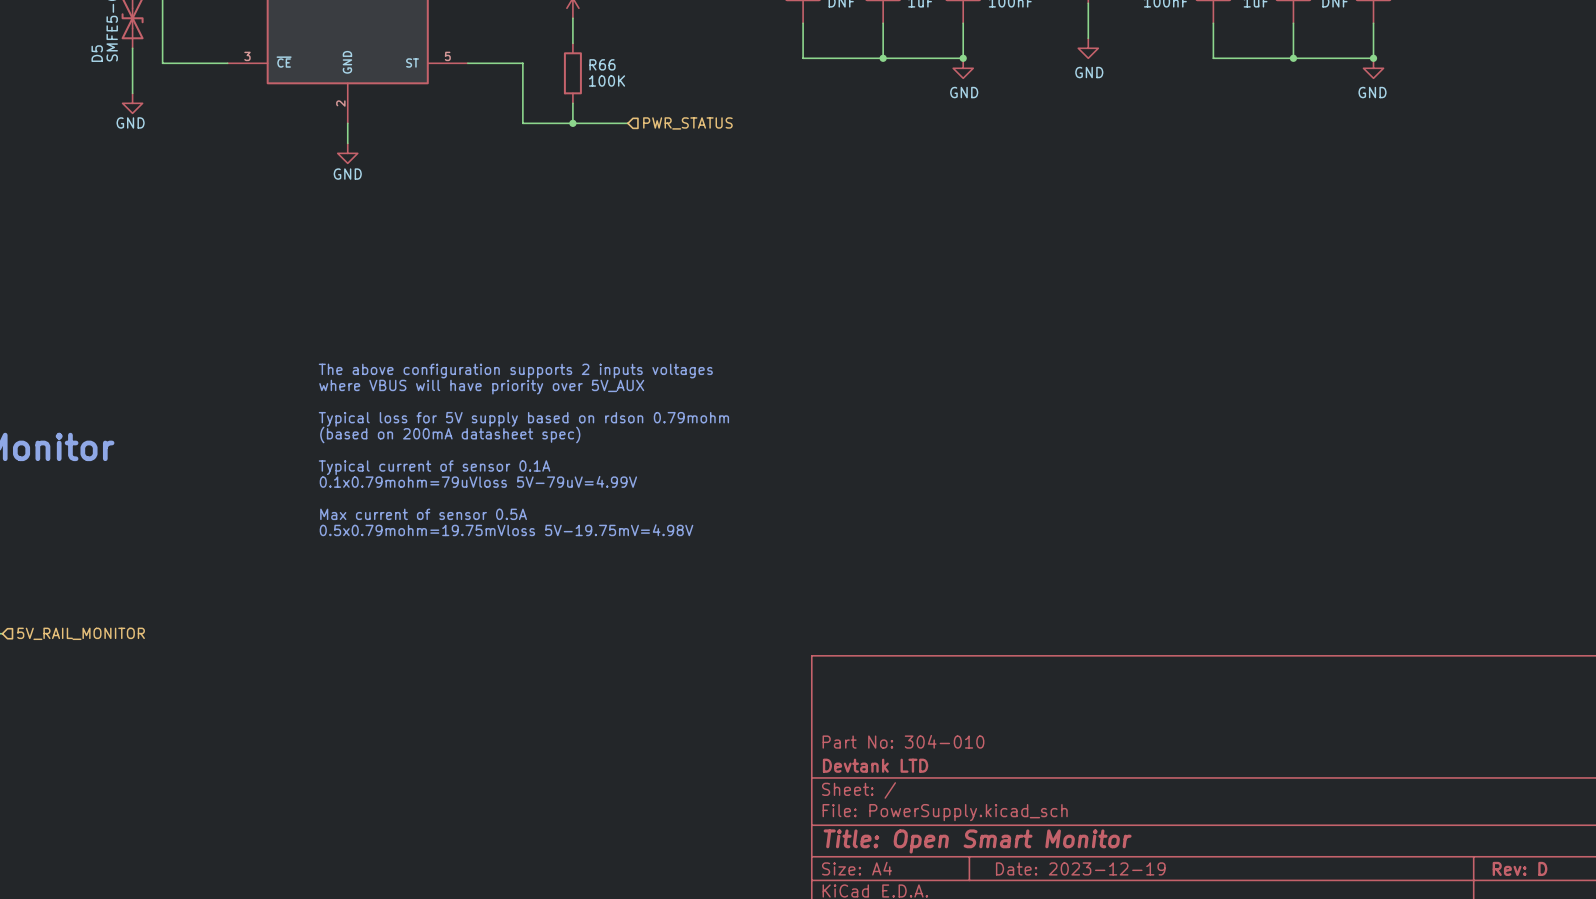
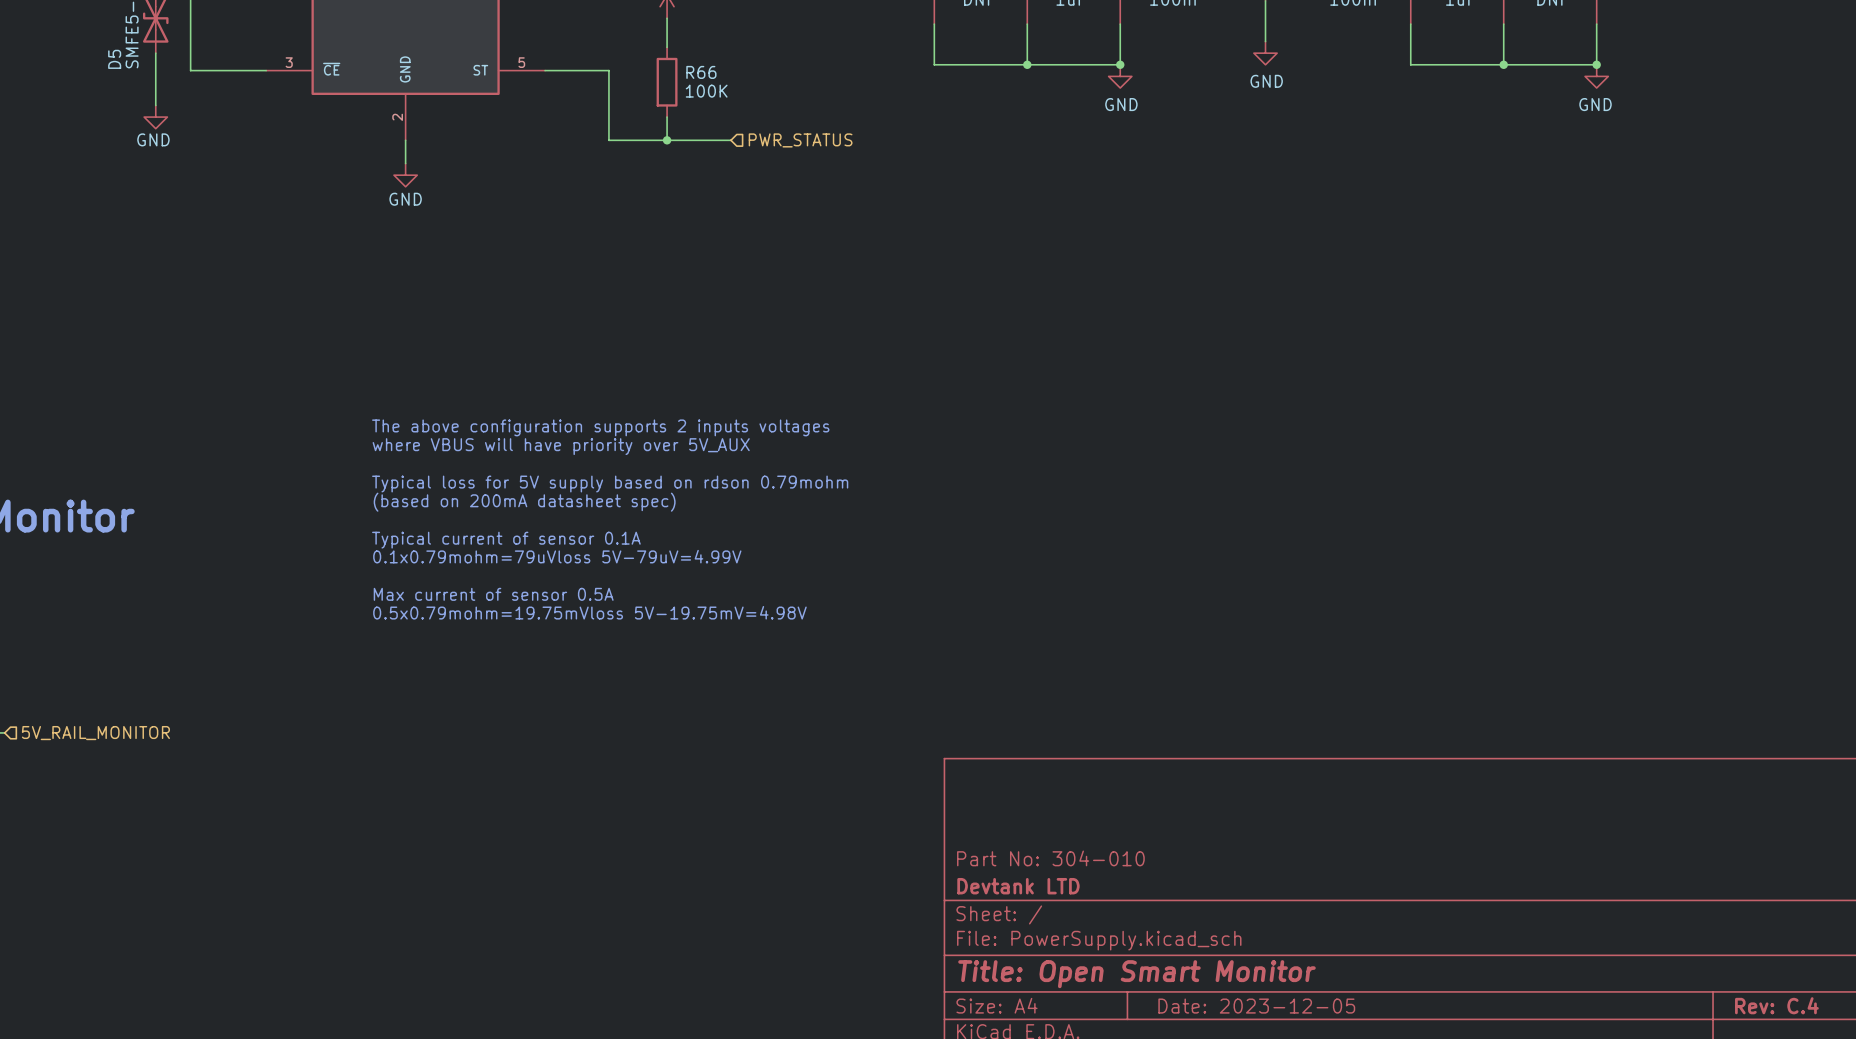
title block: Date: 2023-12-19 (1080, 868) -> Date: 2023-12-05 (1256, 1006)
title block: Rev: D (1520, 868) -> Rev: C.4 (1776, 1005)

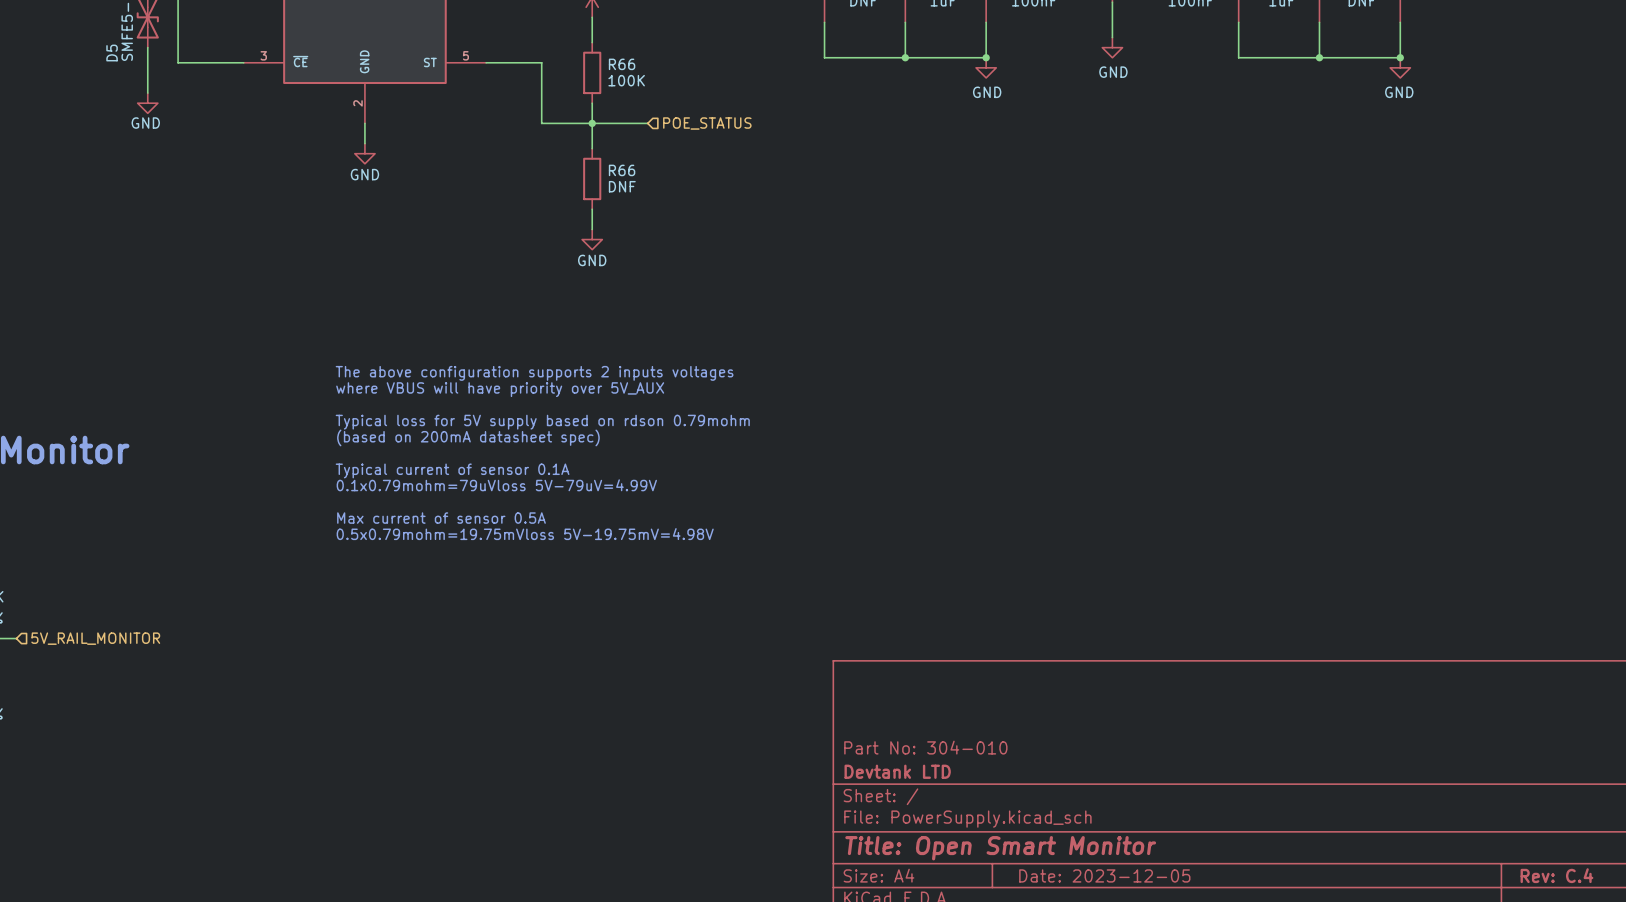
wire: none -> (592, 123) (592, 148)
hierarchical label: PWR_STATUS (800, 140) -> POE_STATUS (707, 123)
R66: none -> DNF (592, 178)
wire: none -> (592, 209) (592, 229)
power symbol: none -> GND (592, 239)

